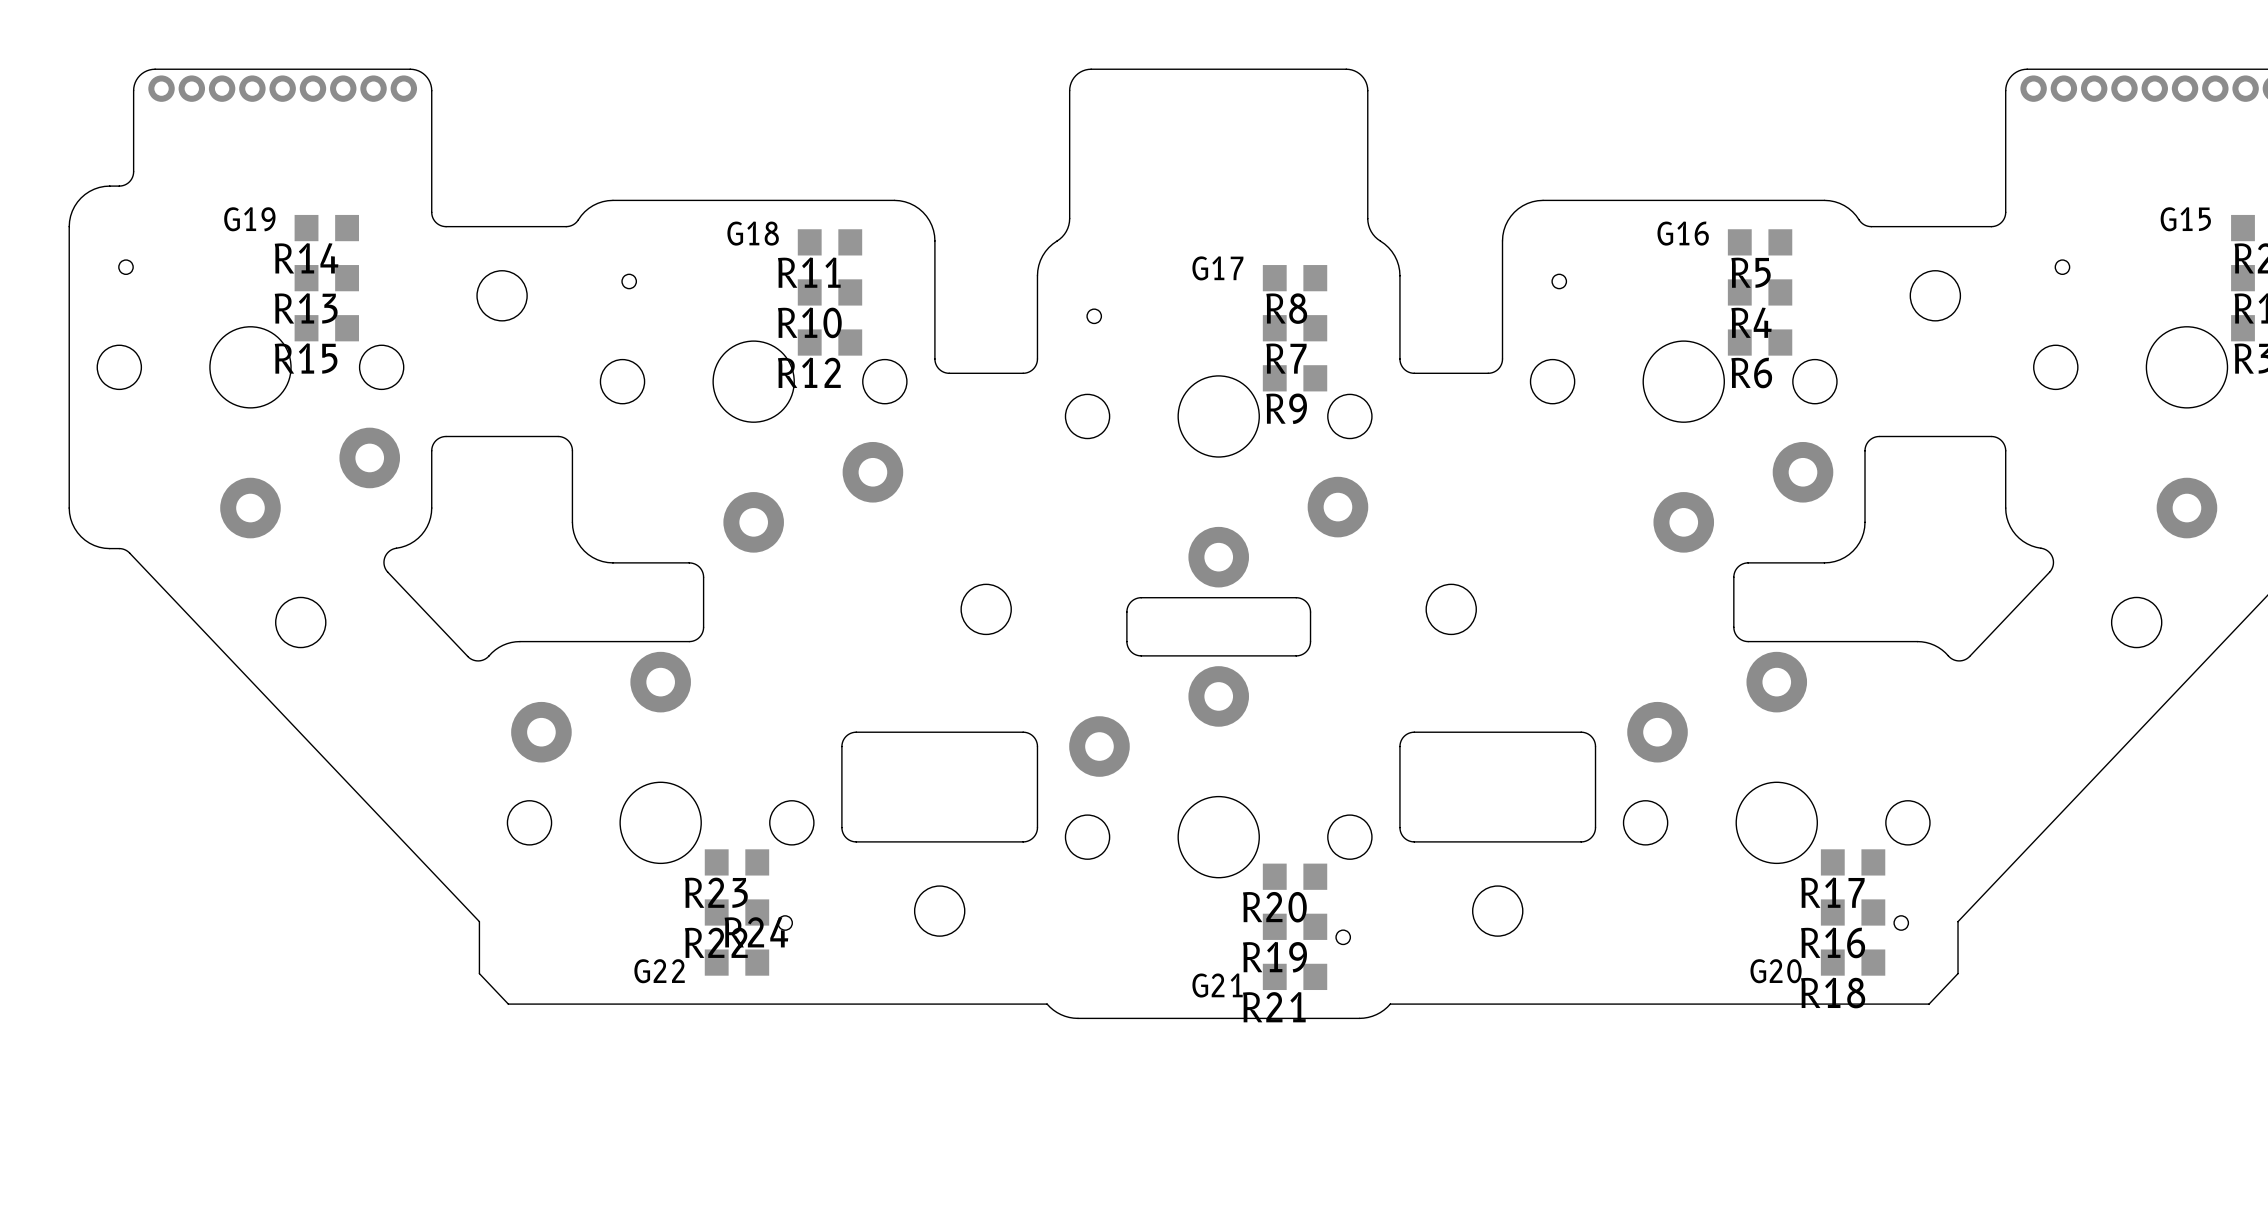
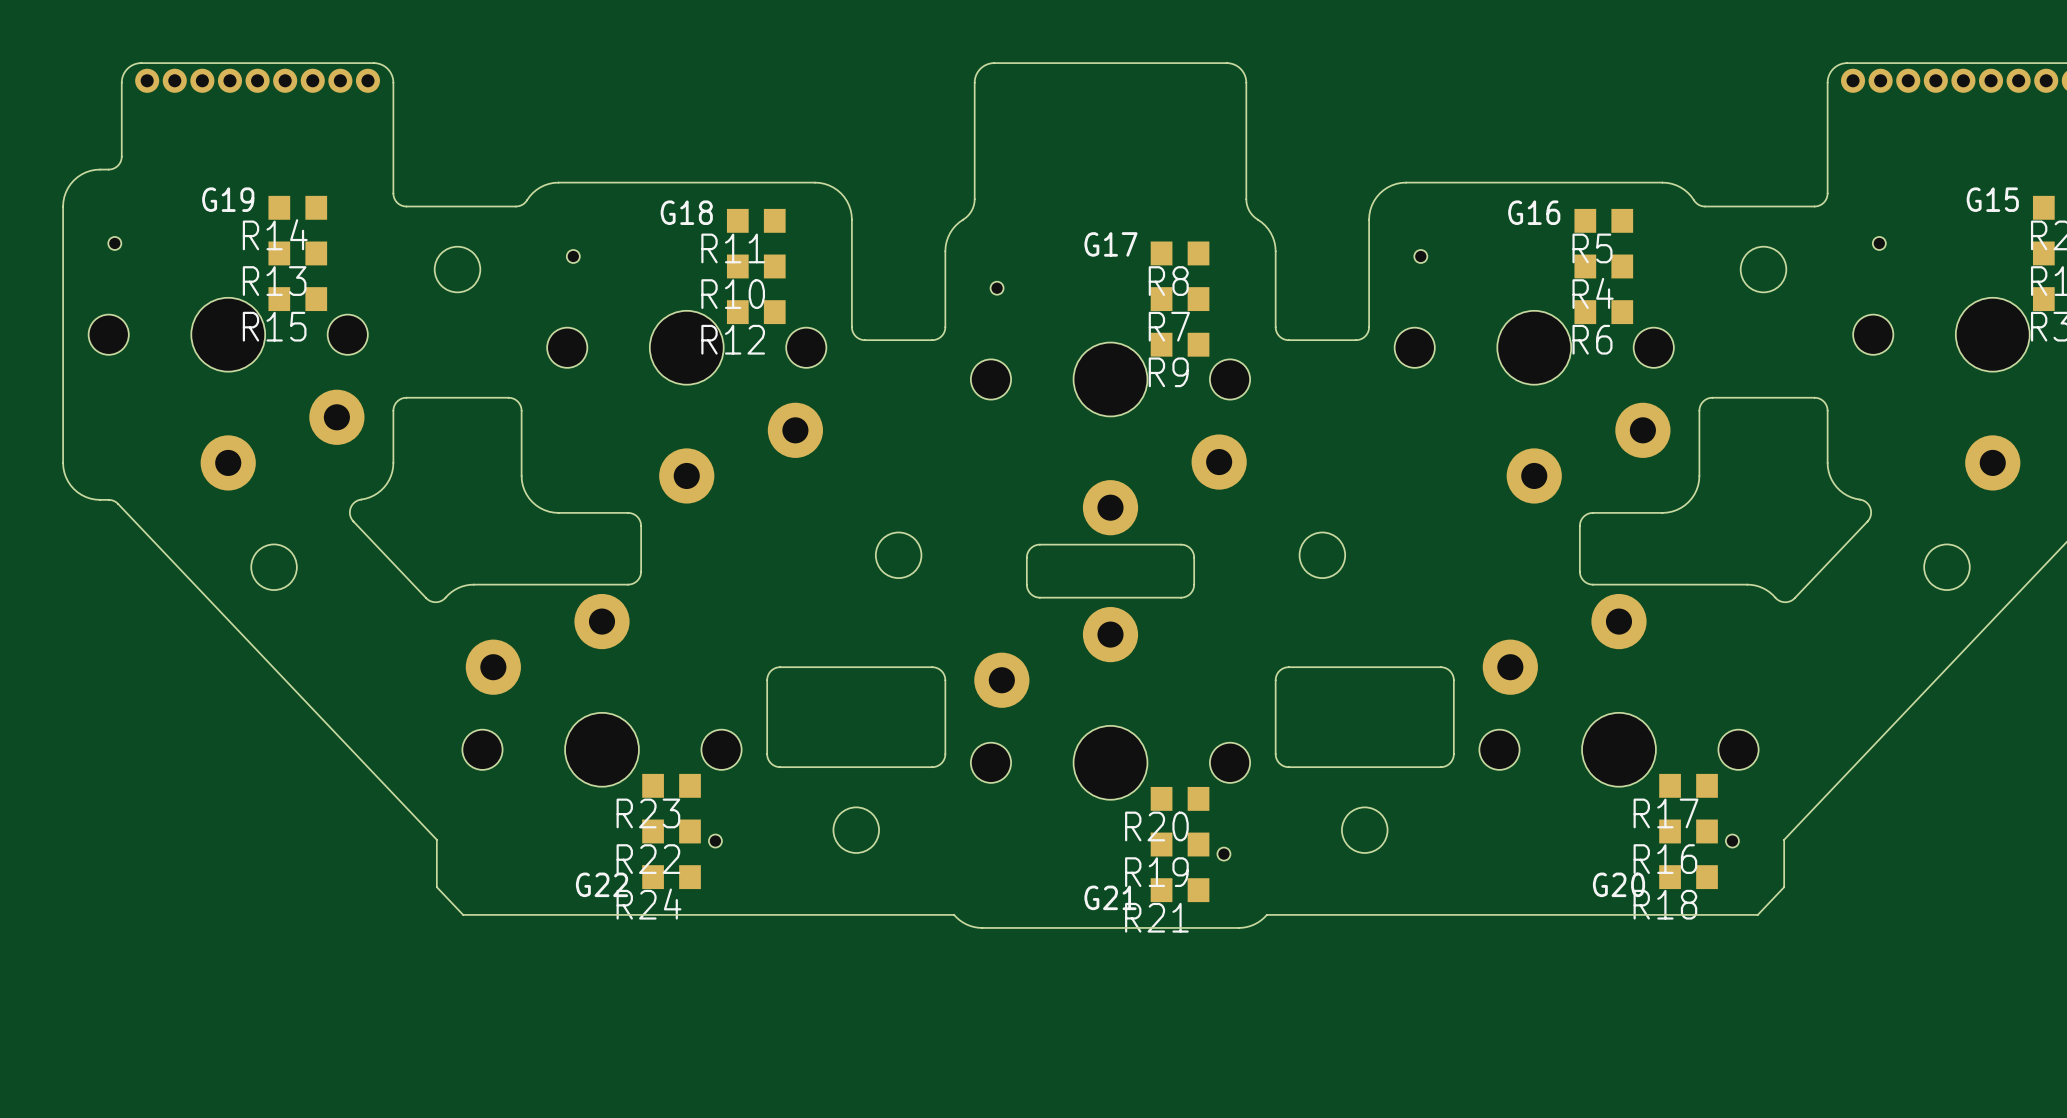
R24 name position: R24 (756, 932) -> R24 (649, 904)

